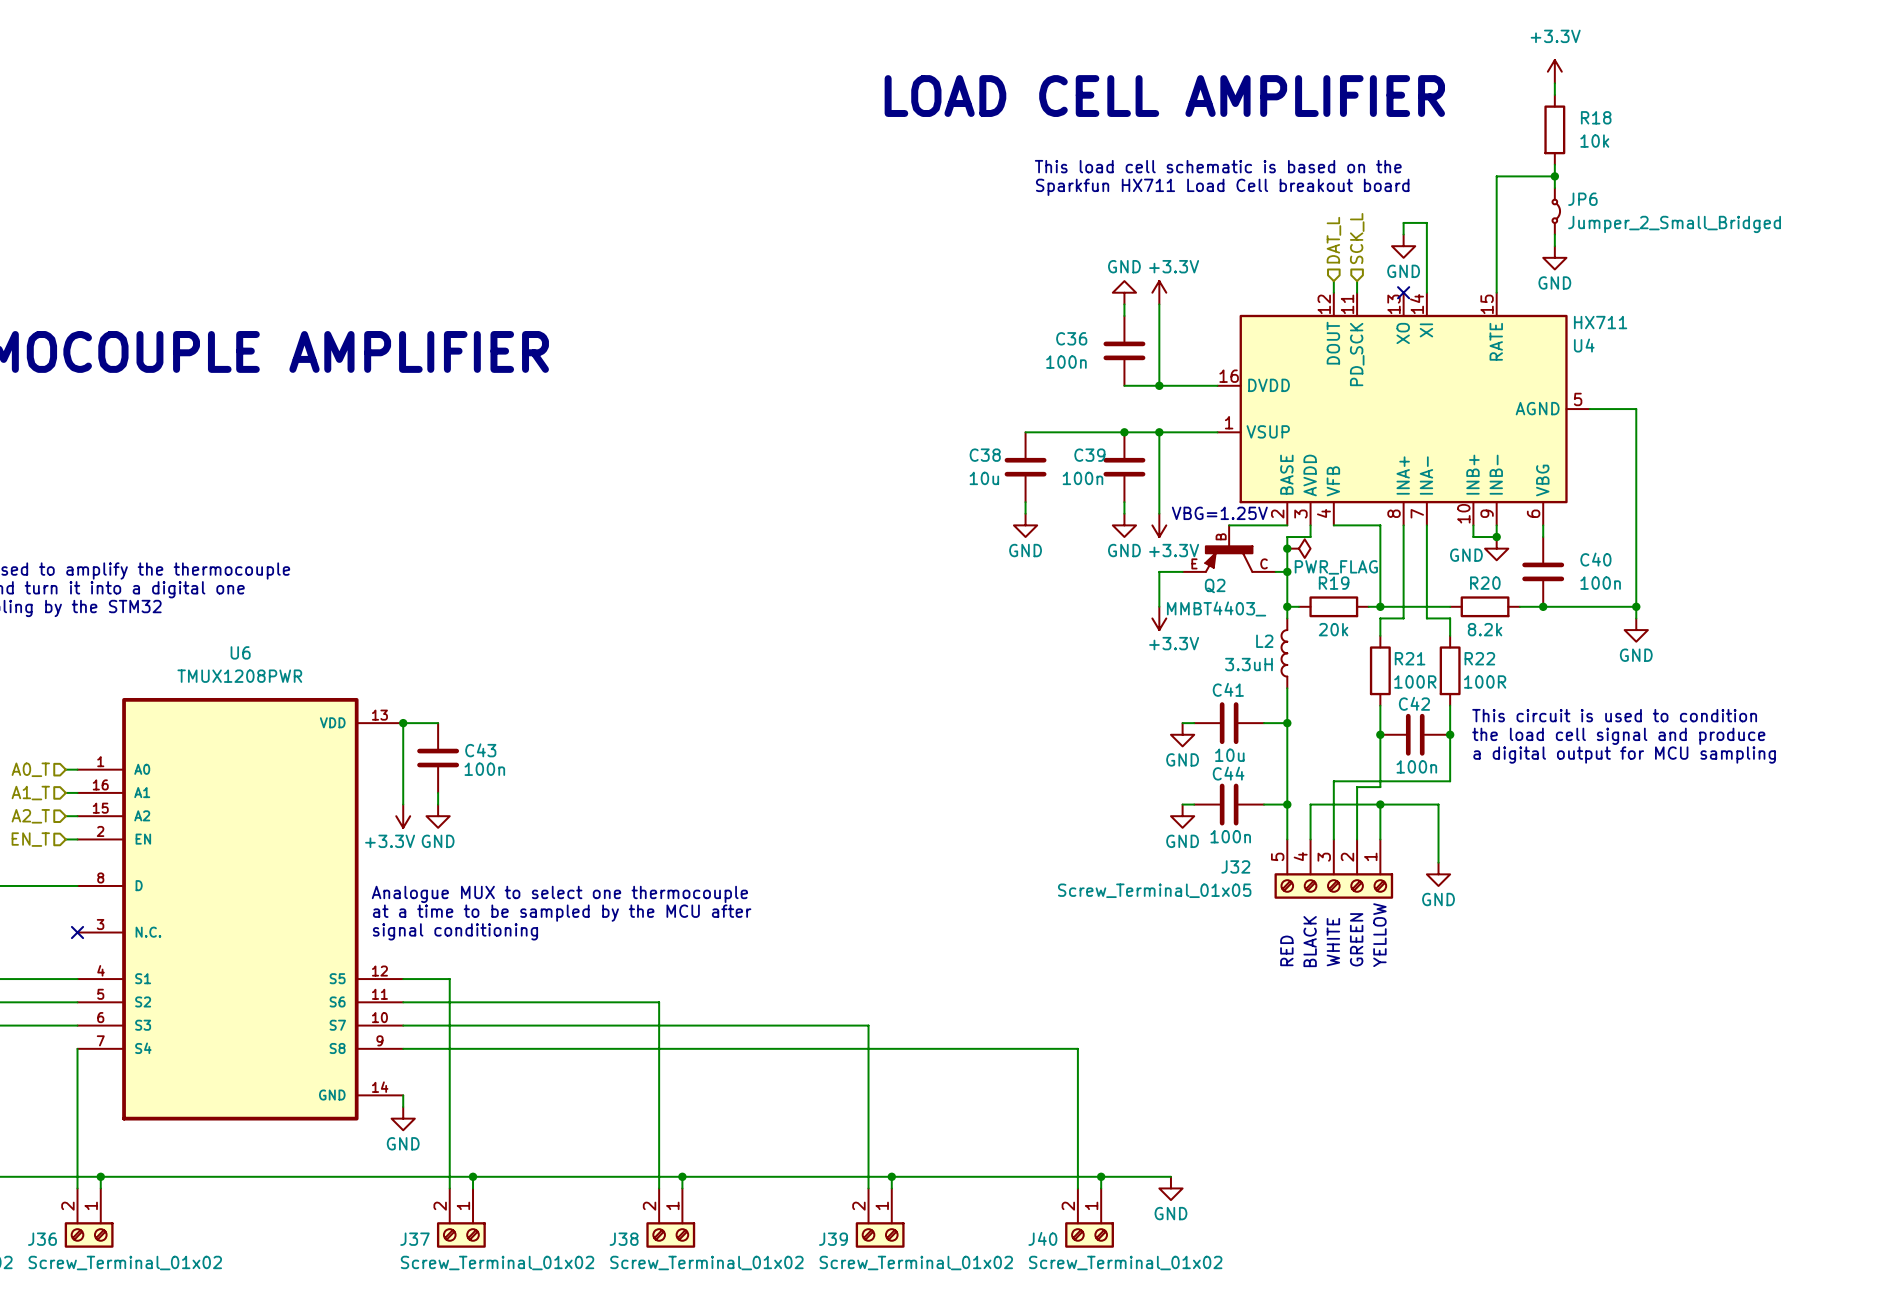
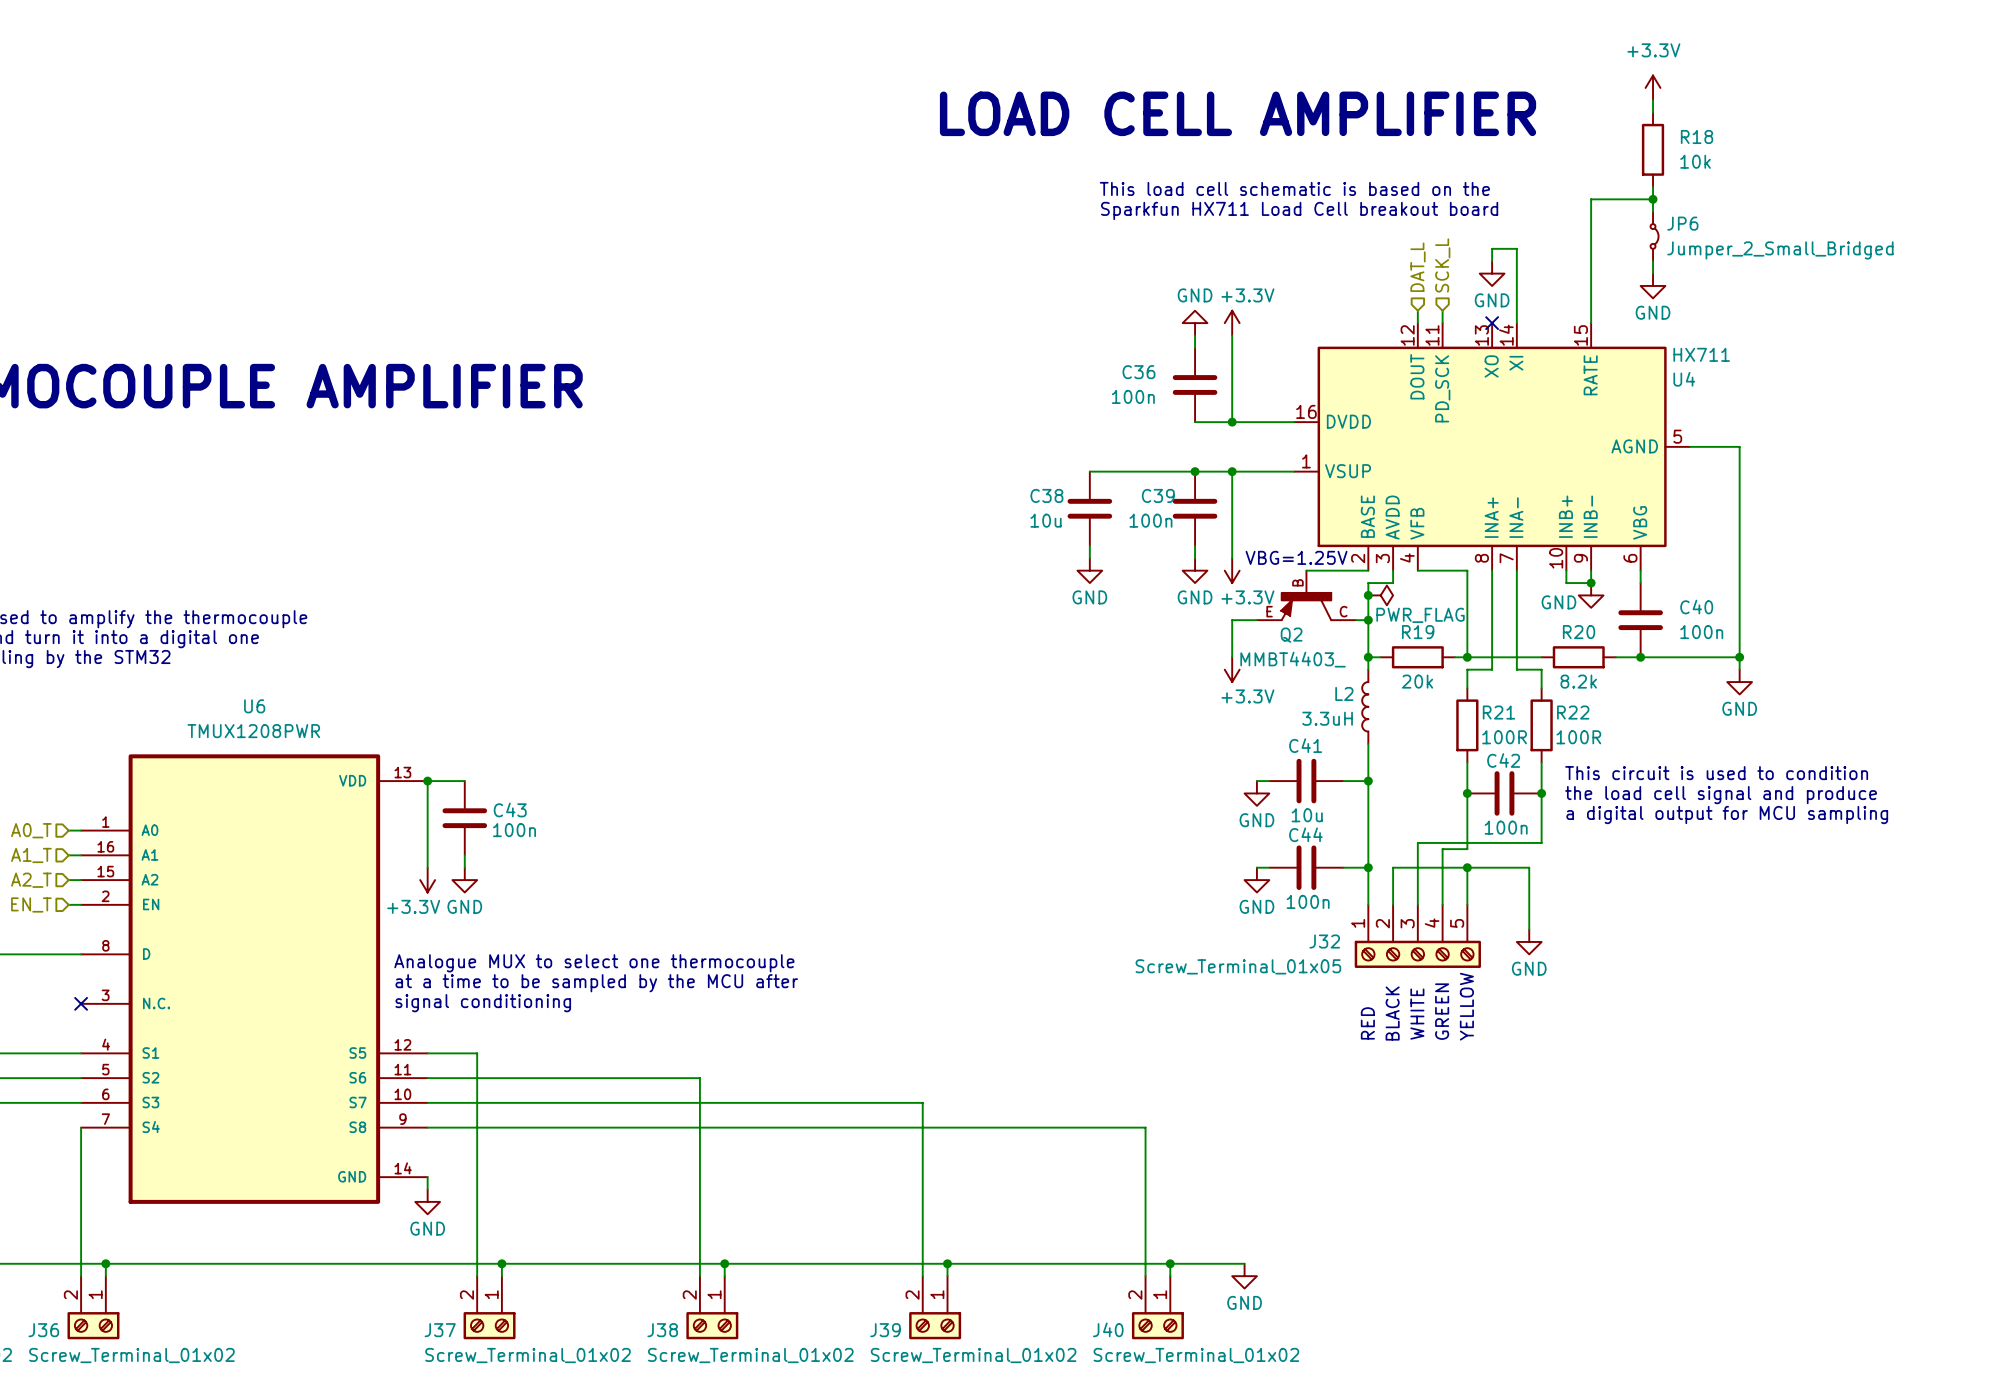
J32 flip: as is (1333, 885) -> left-right (1417, 954)

